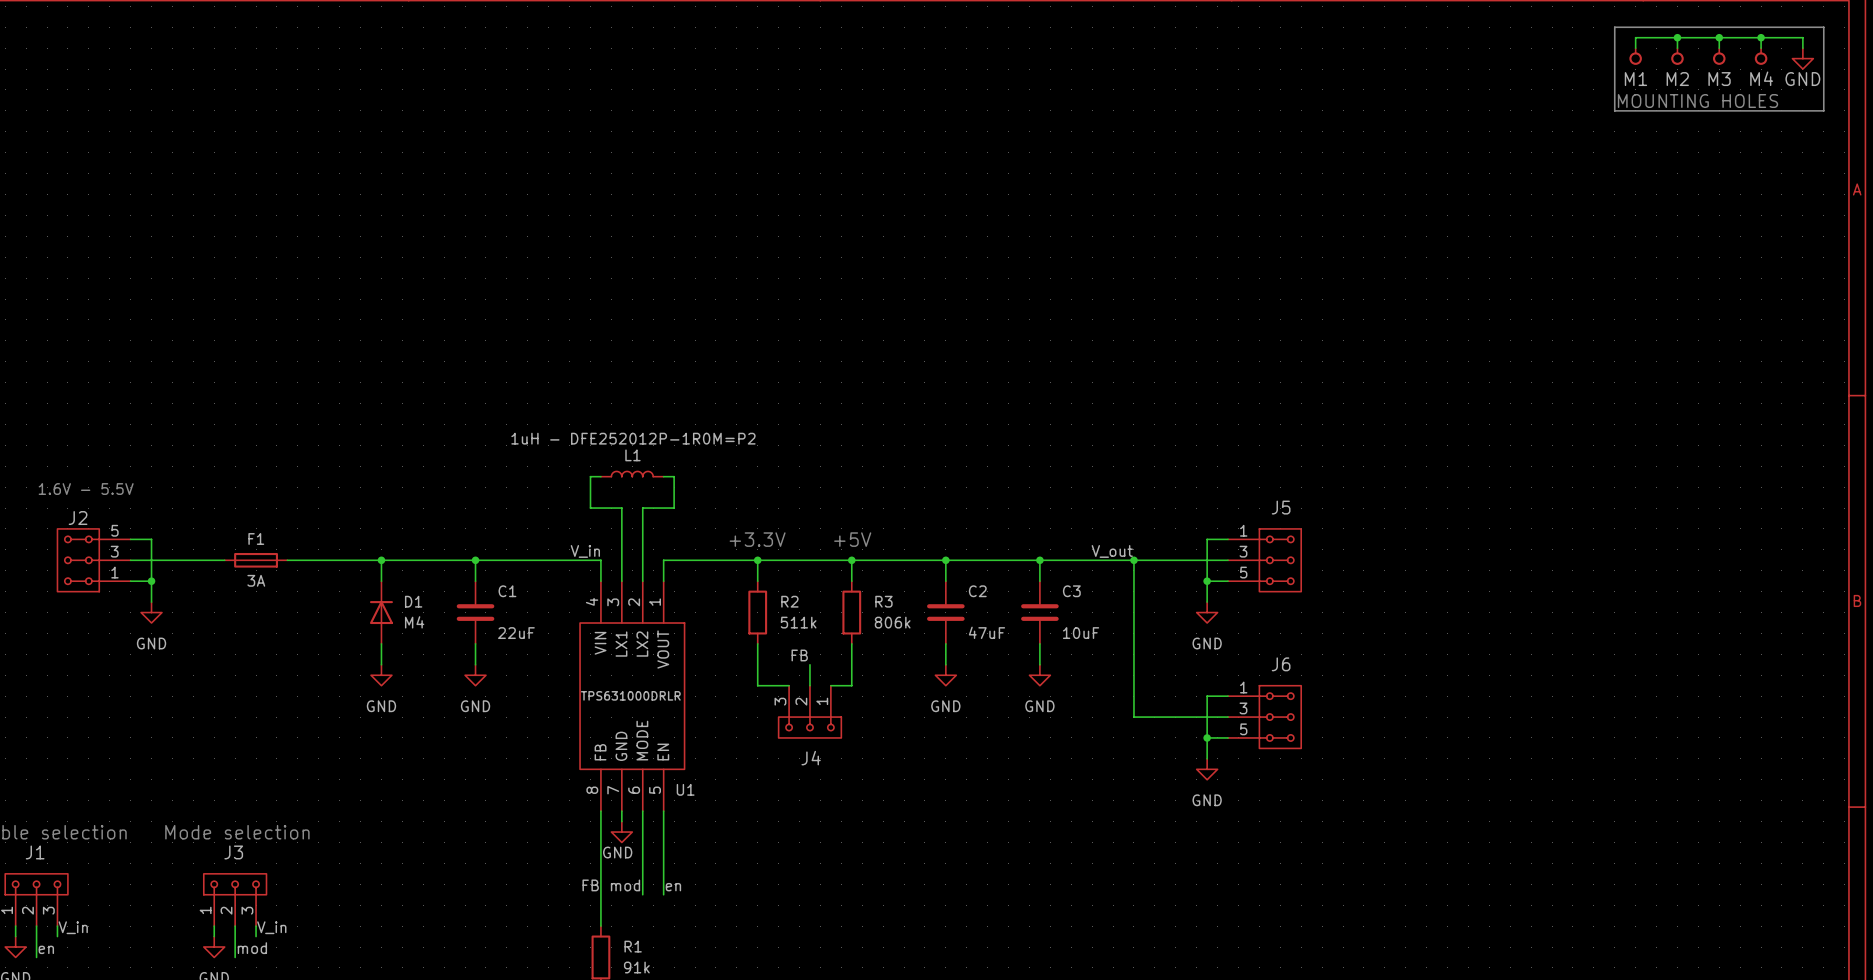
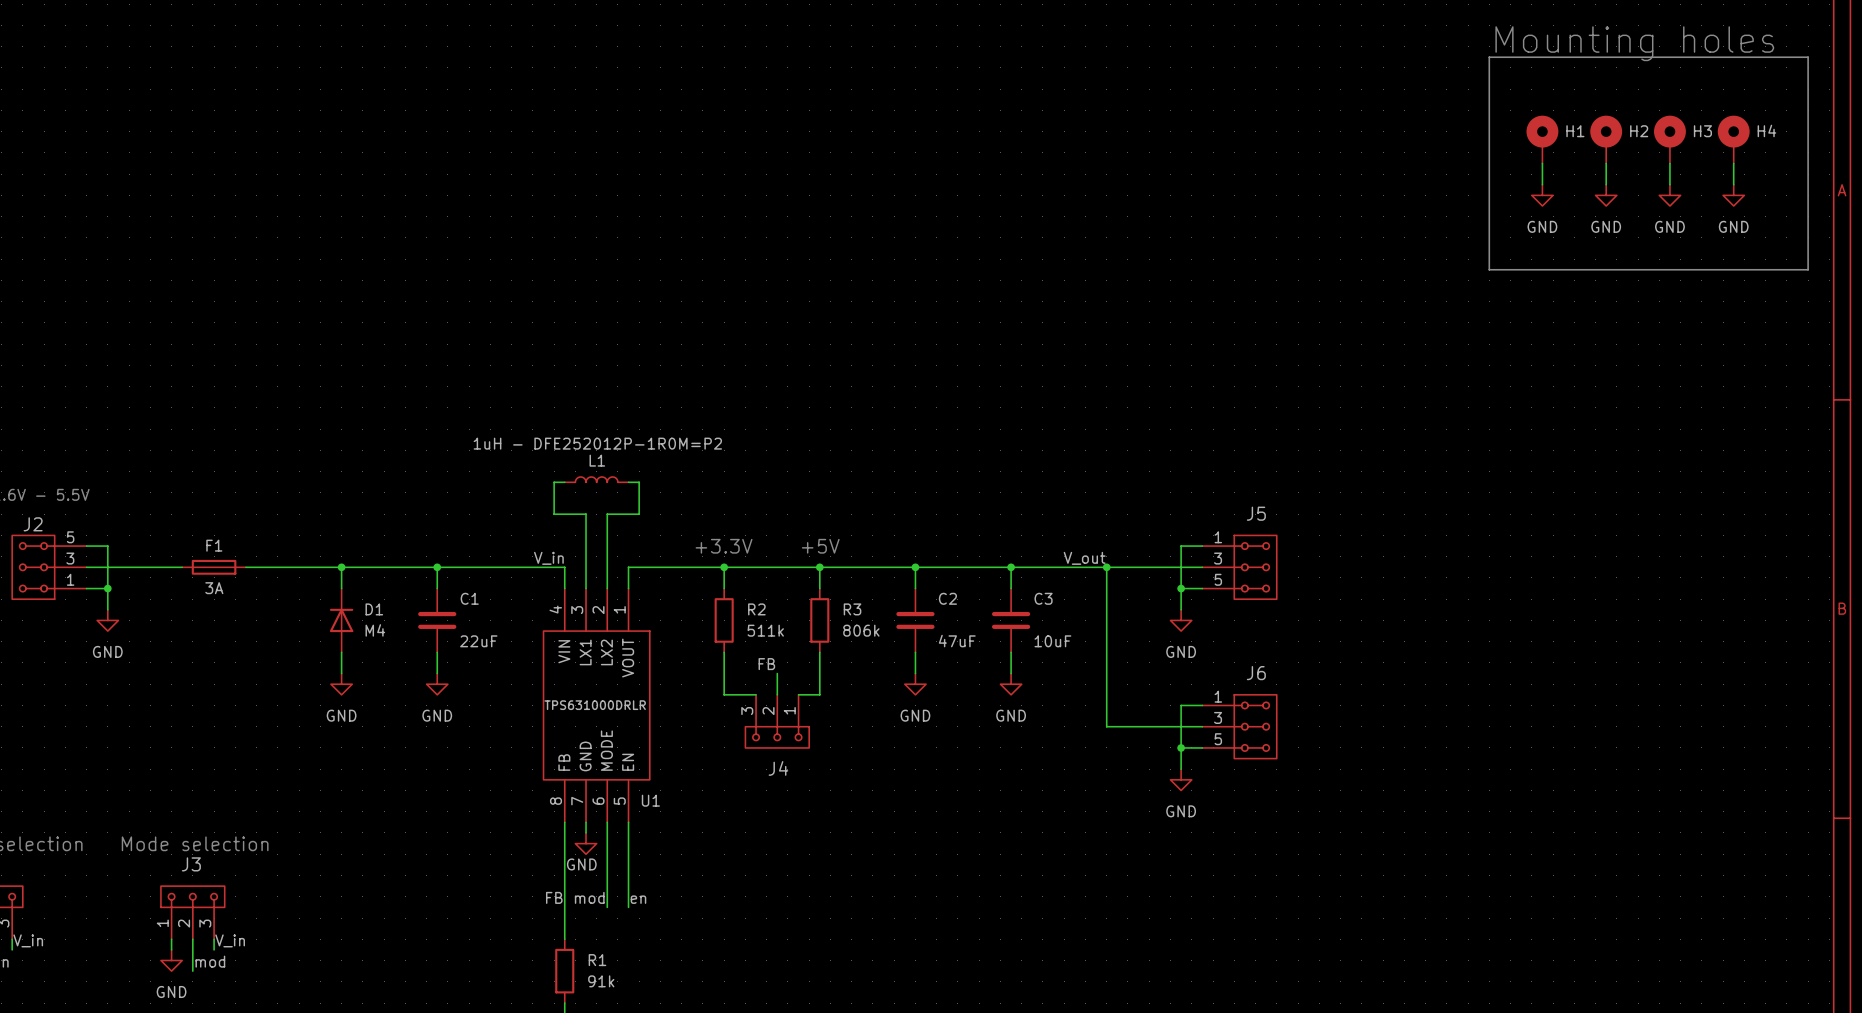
wire: (1677, 37) (1677, 48) -> none
junction: (1677, 37) -> none
wire: (1719, 37) (1719, 48) -> none
junction: (1719, 37) -> none
wire: (1761, 37) (1761, 48) -> none
junction: (1761, 37) -> none
text: none -> Mounting holes (1634, 43)
wire: (1635, 48) (1635, 37) (1802, 37) (1802, 48) -> none
M1: (1635, 56) -> none
M2: (1677, 56) -> none
M3: (1719, 56) -> none
M4: (1761, 56) -> none
power symbol: GND (1802, 58) -> none
line: (1823, 58) (1823, 27) (1614, 27) (1614, 110) (1823, 110) -> (1808, 57) (1489, 57) (1489, 269) (1808, 269) (1808, 110)
text: MOUNTING HOLES (1697, 101) -> none
H1: none -> (1542, 139)
H2: none -> (1606, 139)
H3: none -> (1669, 139)
H4: none -> (1733, 139)
wire: none -> (1542, 163) (1542, 184)
wire: none -> (1606, 163) (1606, 184)
wire: none -> (1669, 163) (1669, 184)
wire: none -> (1733, 163) (1733, 184)
power symbol: none -> GND (1542, 195)
power symbol: none -> GND (1606, 195)
power symbol: none -> GND (1669, 195)
power symbol: none -> GND (1733, 195)

